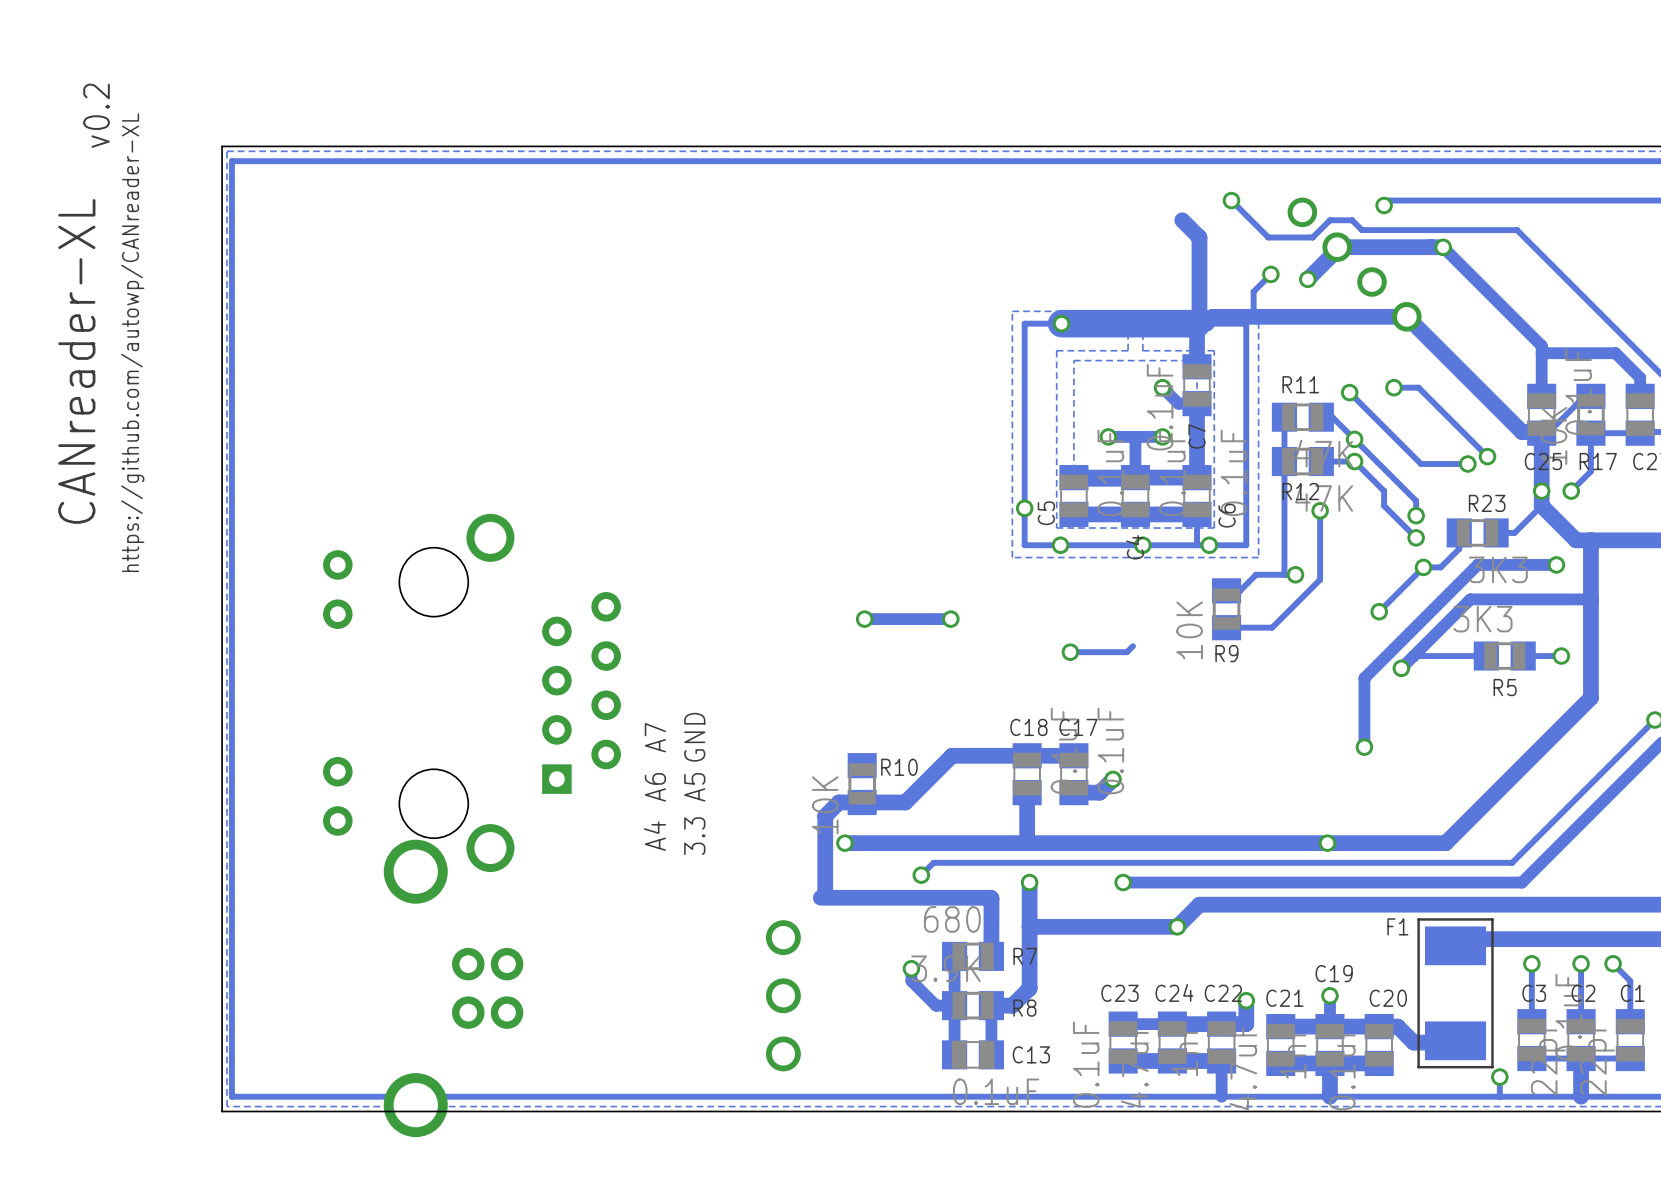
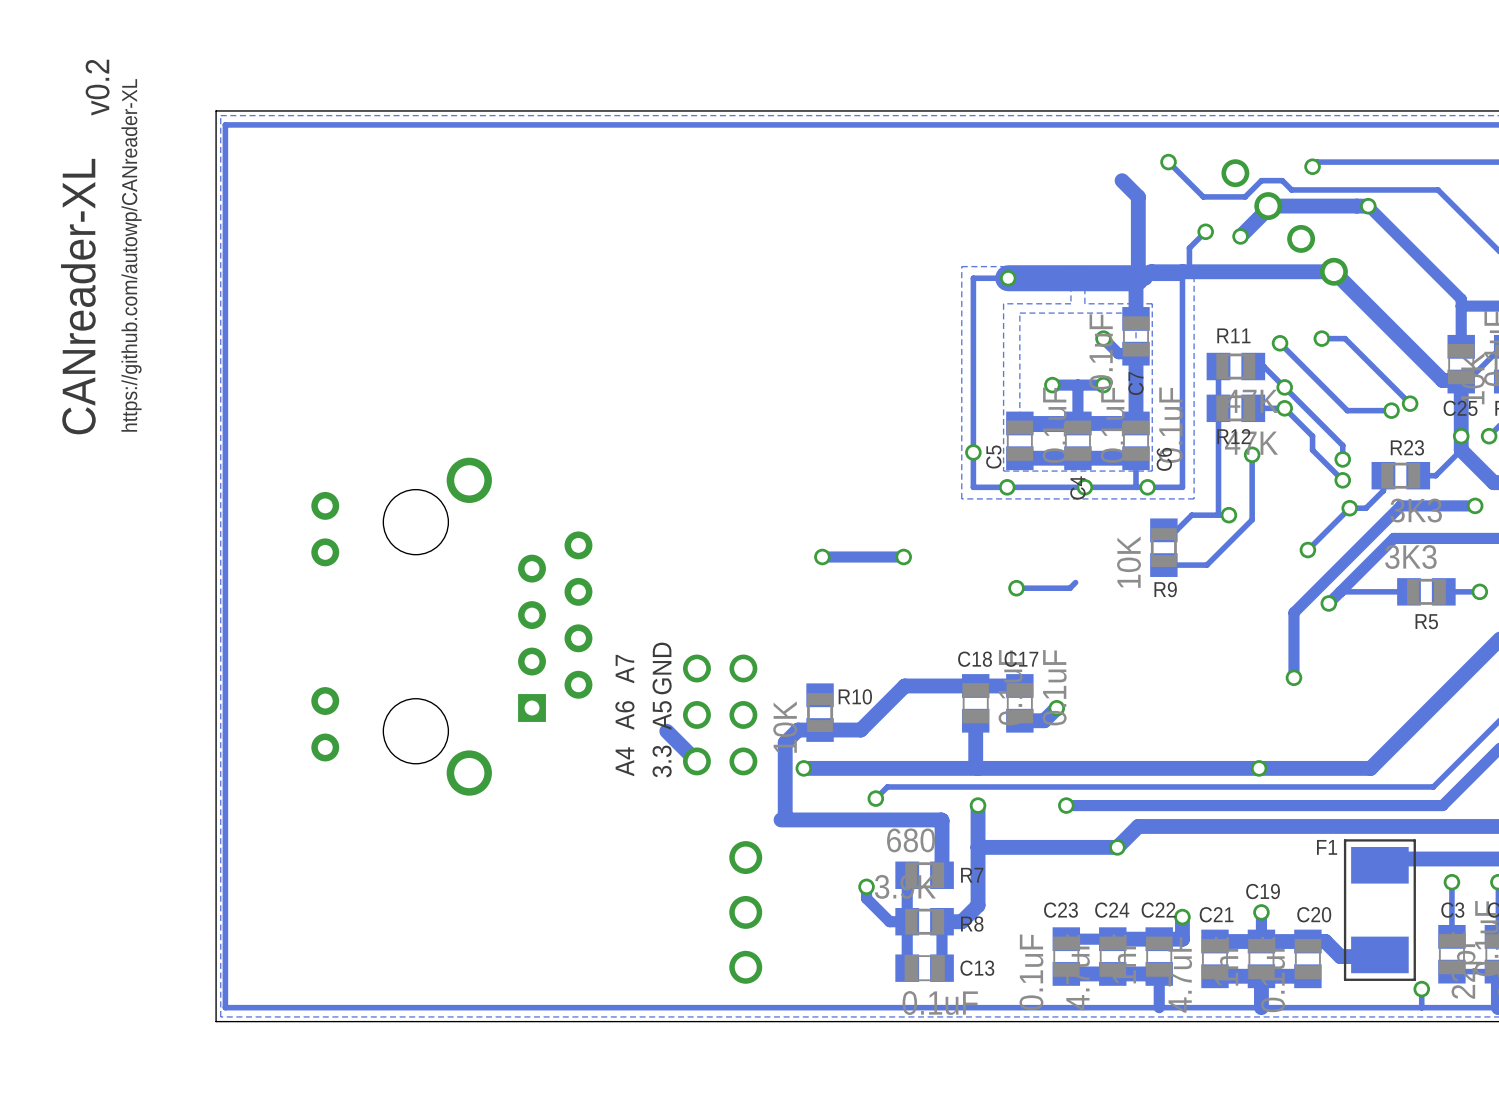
part: none -> (720, 714)
track: none -> (666, 731) (696, 761)
part: (453, 988) -> none

